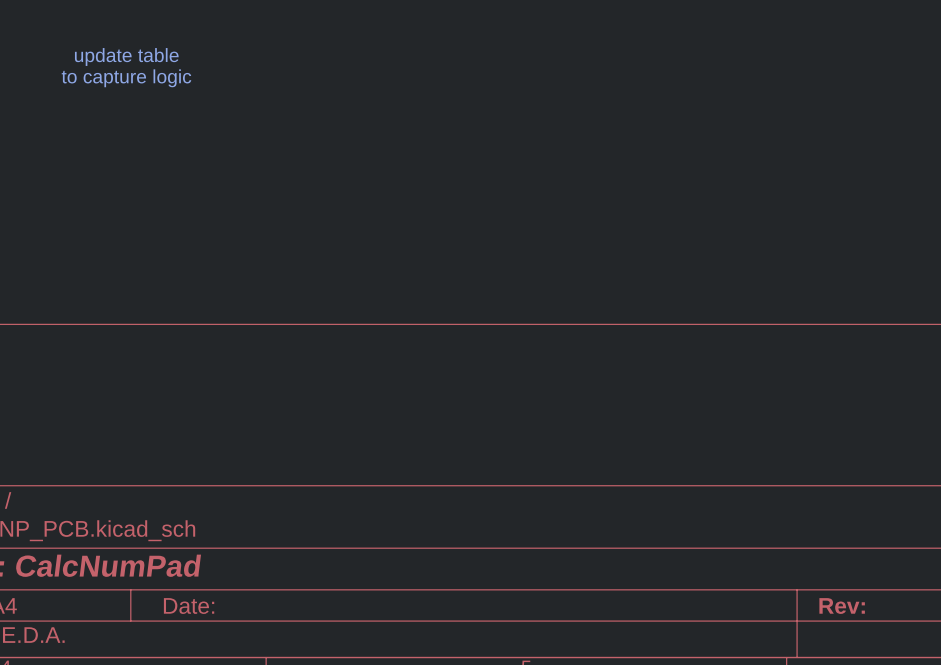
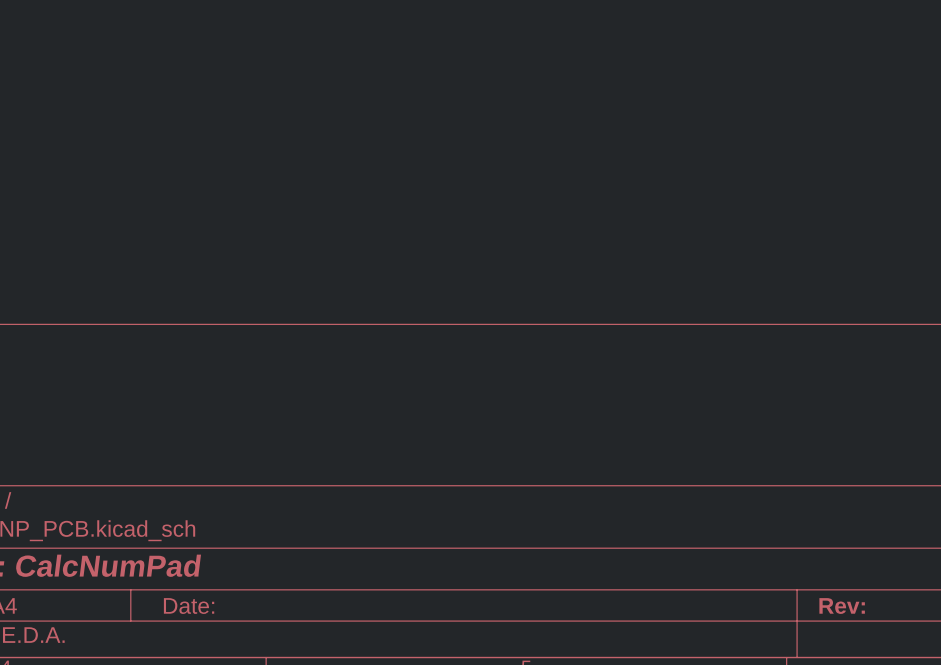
text: update table (126, 57) -> none
text: to capture logic (126, 78) -> none

